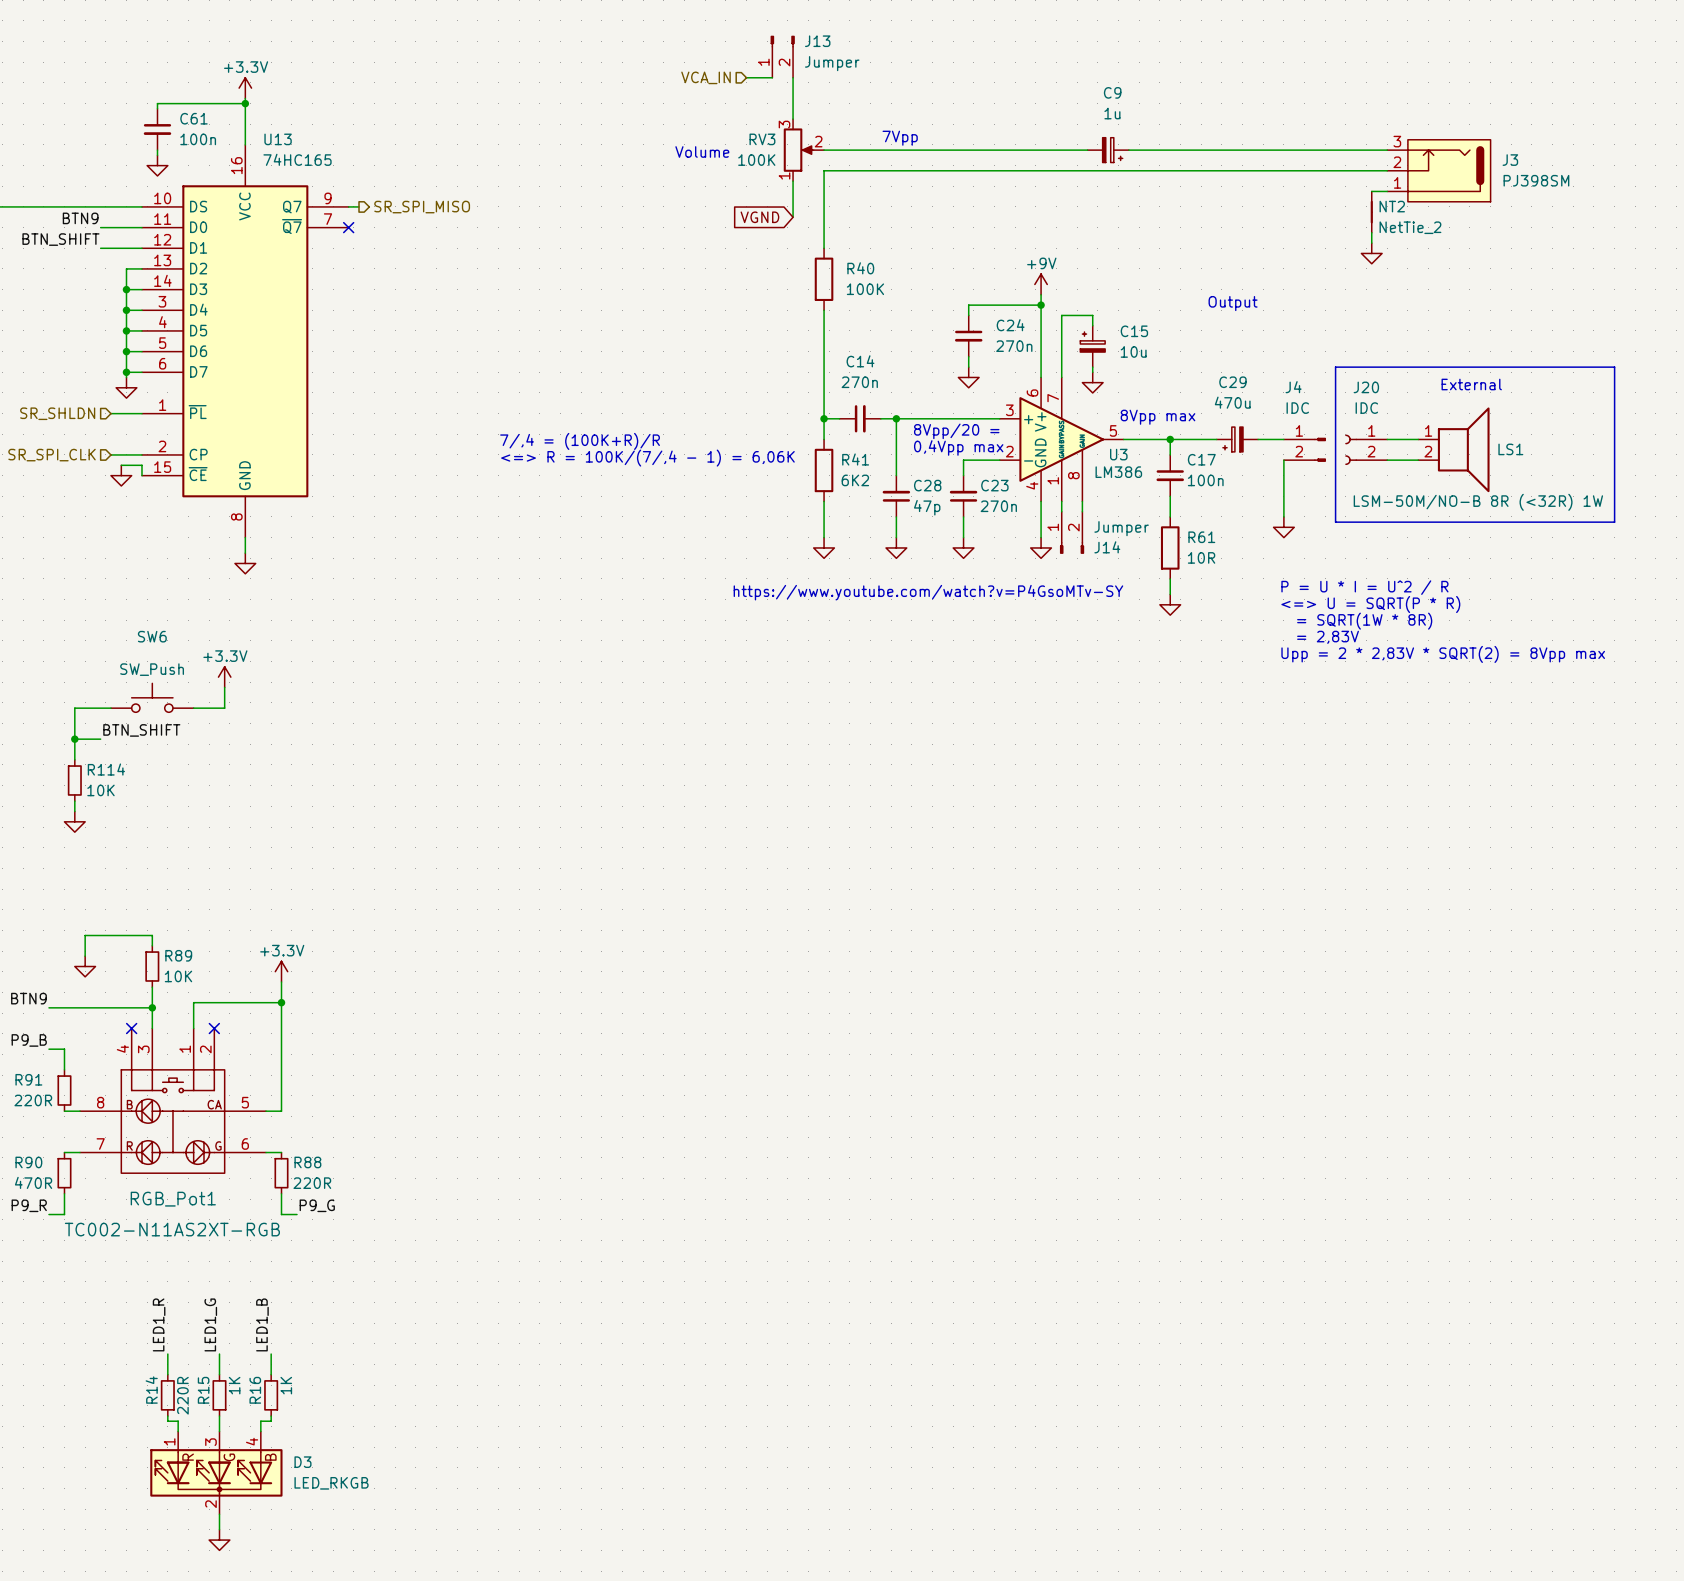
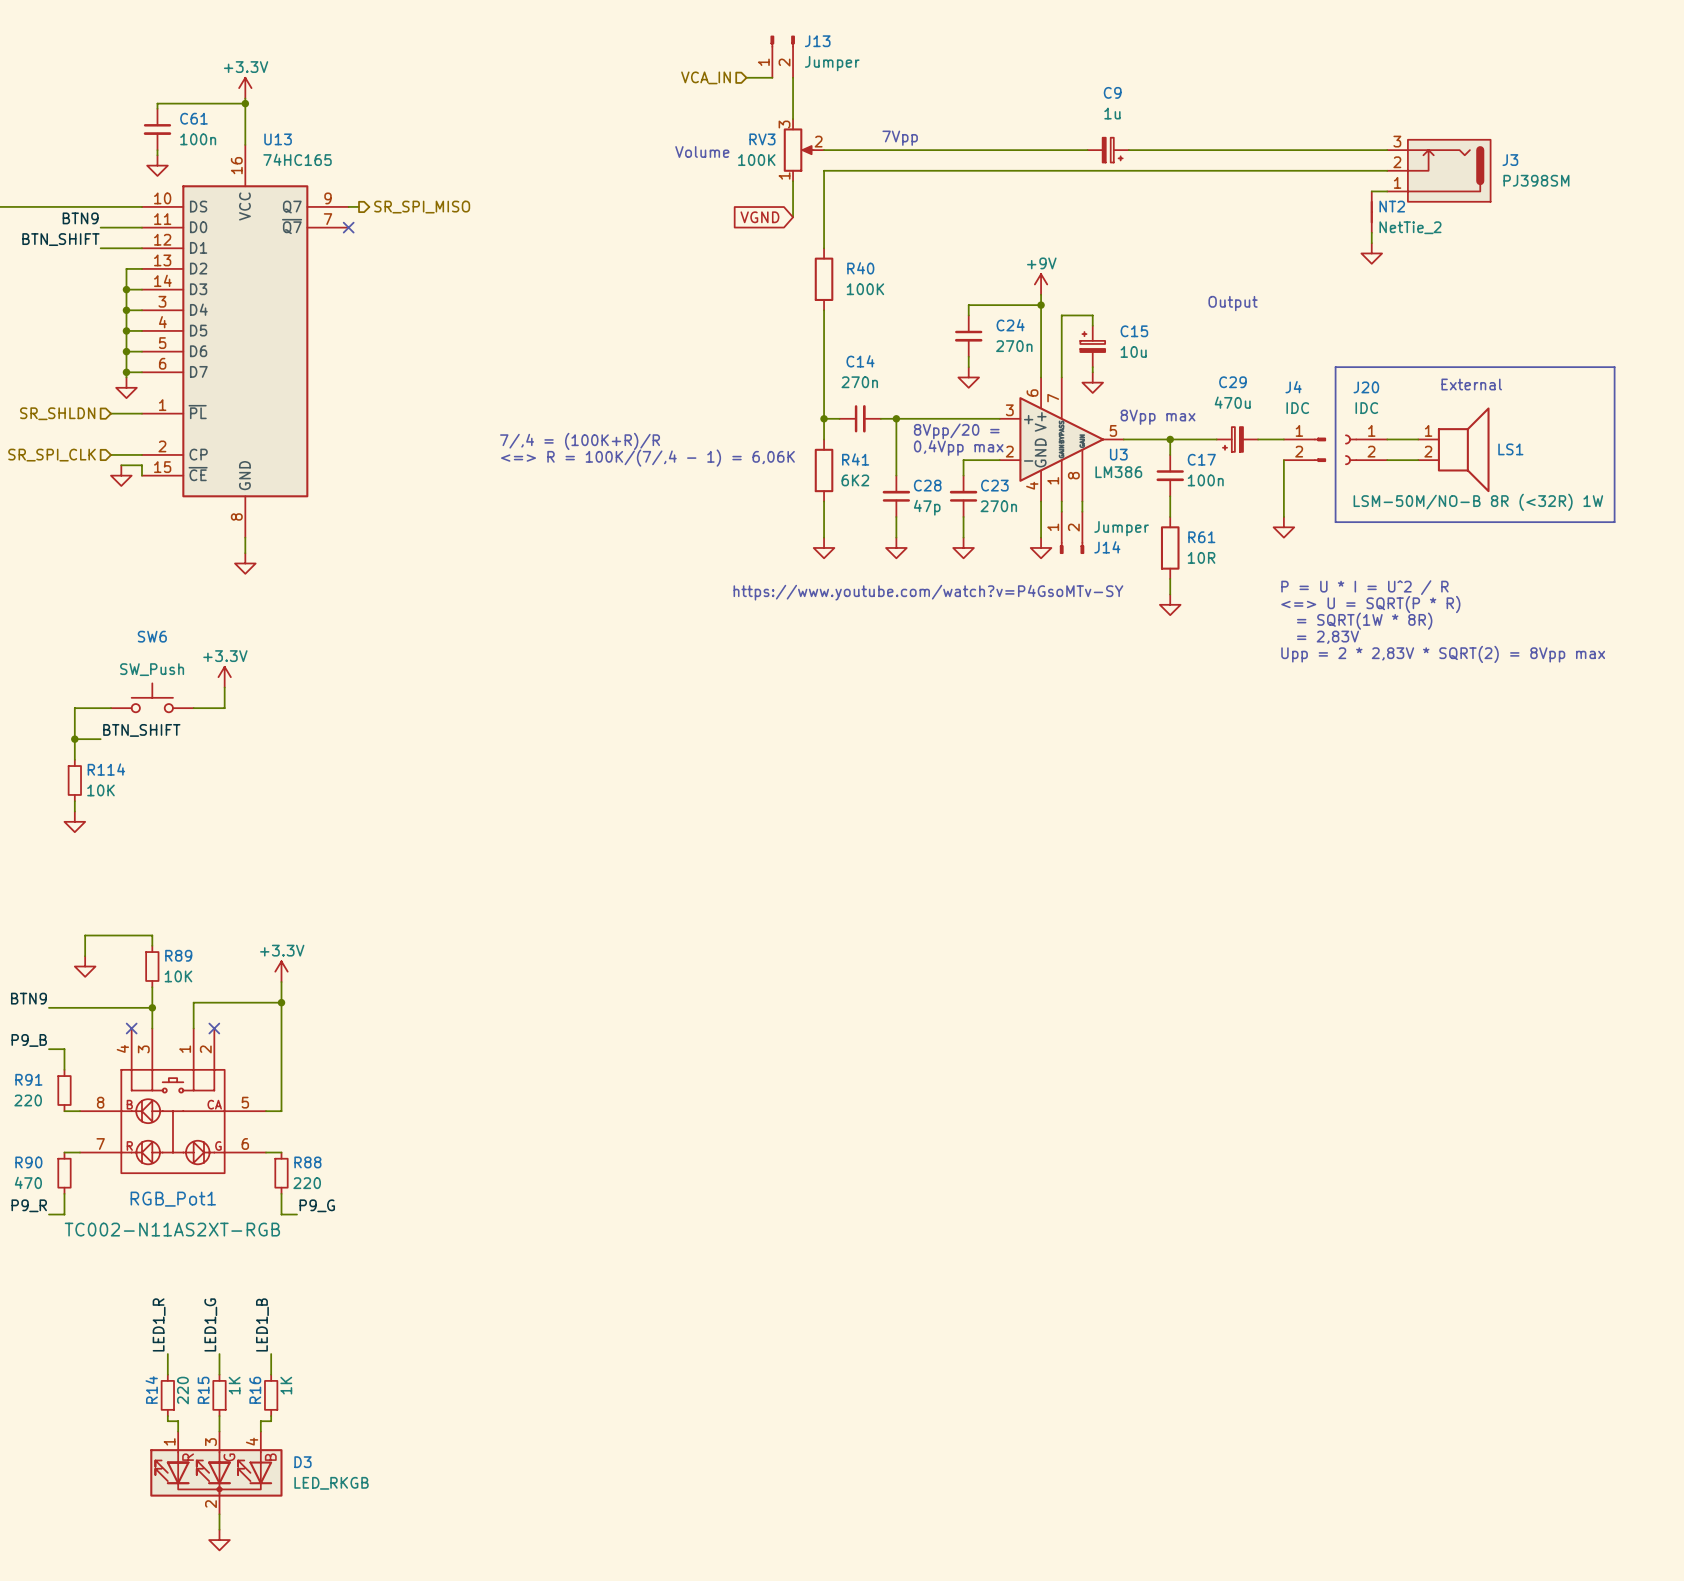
R91 value: 220R (33, 1100) -> 220 (28, 1100)
R90 value: 470R (33, 1182) -> 470 (28, 1182)
R88 value: 220R (312, 1183) -> 220 (307, 1183)
R14 value: 220R (182, 1395) -> 220 (182, 1390)

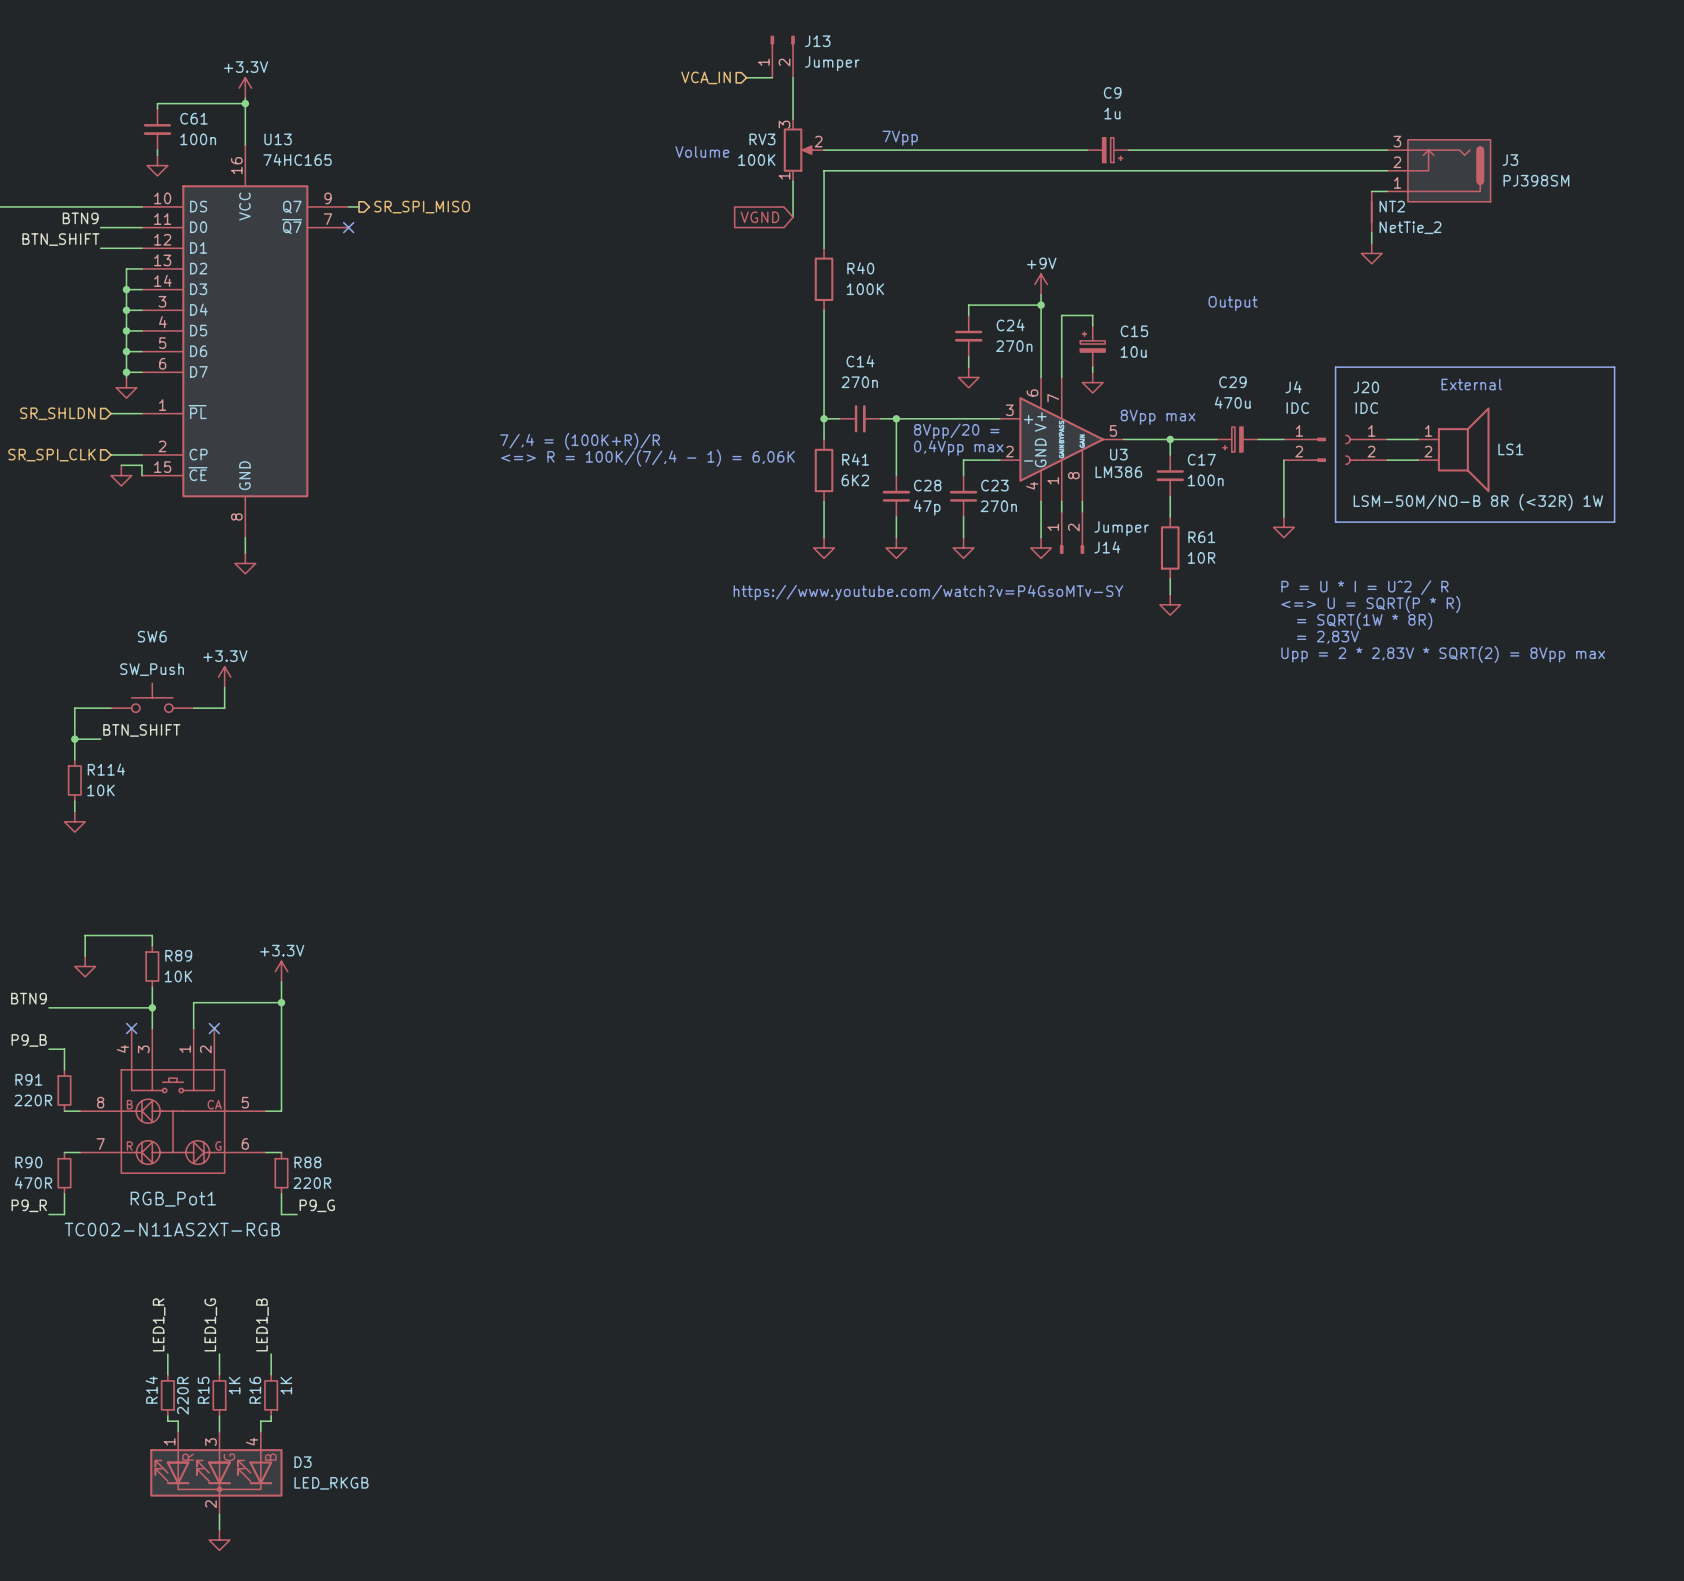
R91 value: 220 (28, 1100) -> 220R (33, 1100)
R90 value: 470 (28, 1182) -> 470R (33, 1182)
R88 value: 220 (307, 1183) -> 220R (312, 1183)
R14 value: 220 (182, 1390) -> 220R (182, 1395)

